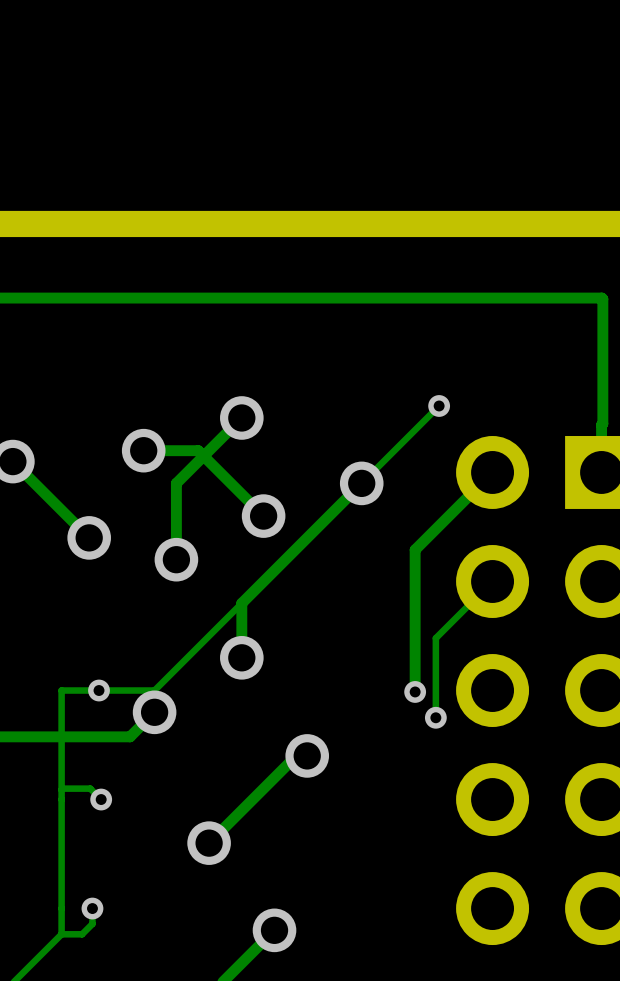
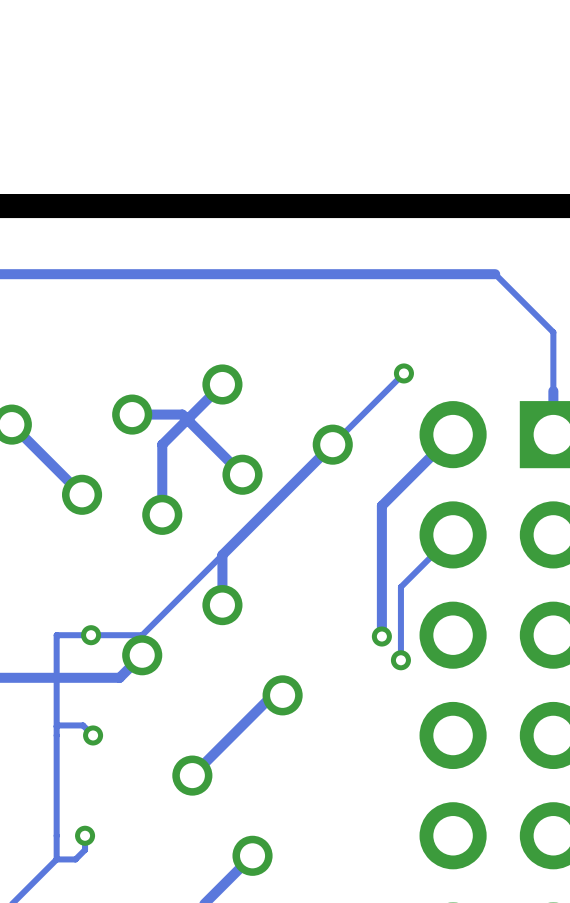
track: (538, 298) (602, 299) (601, 425) -> (495, 274) (553, 332) (553, 391)

